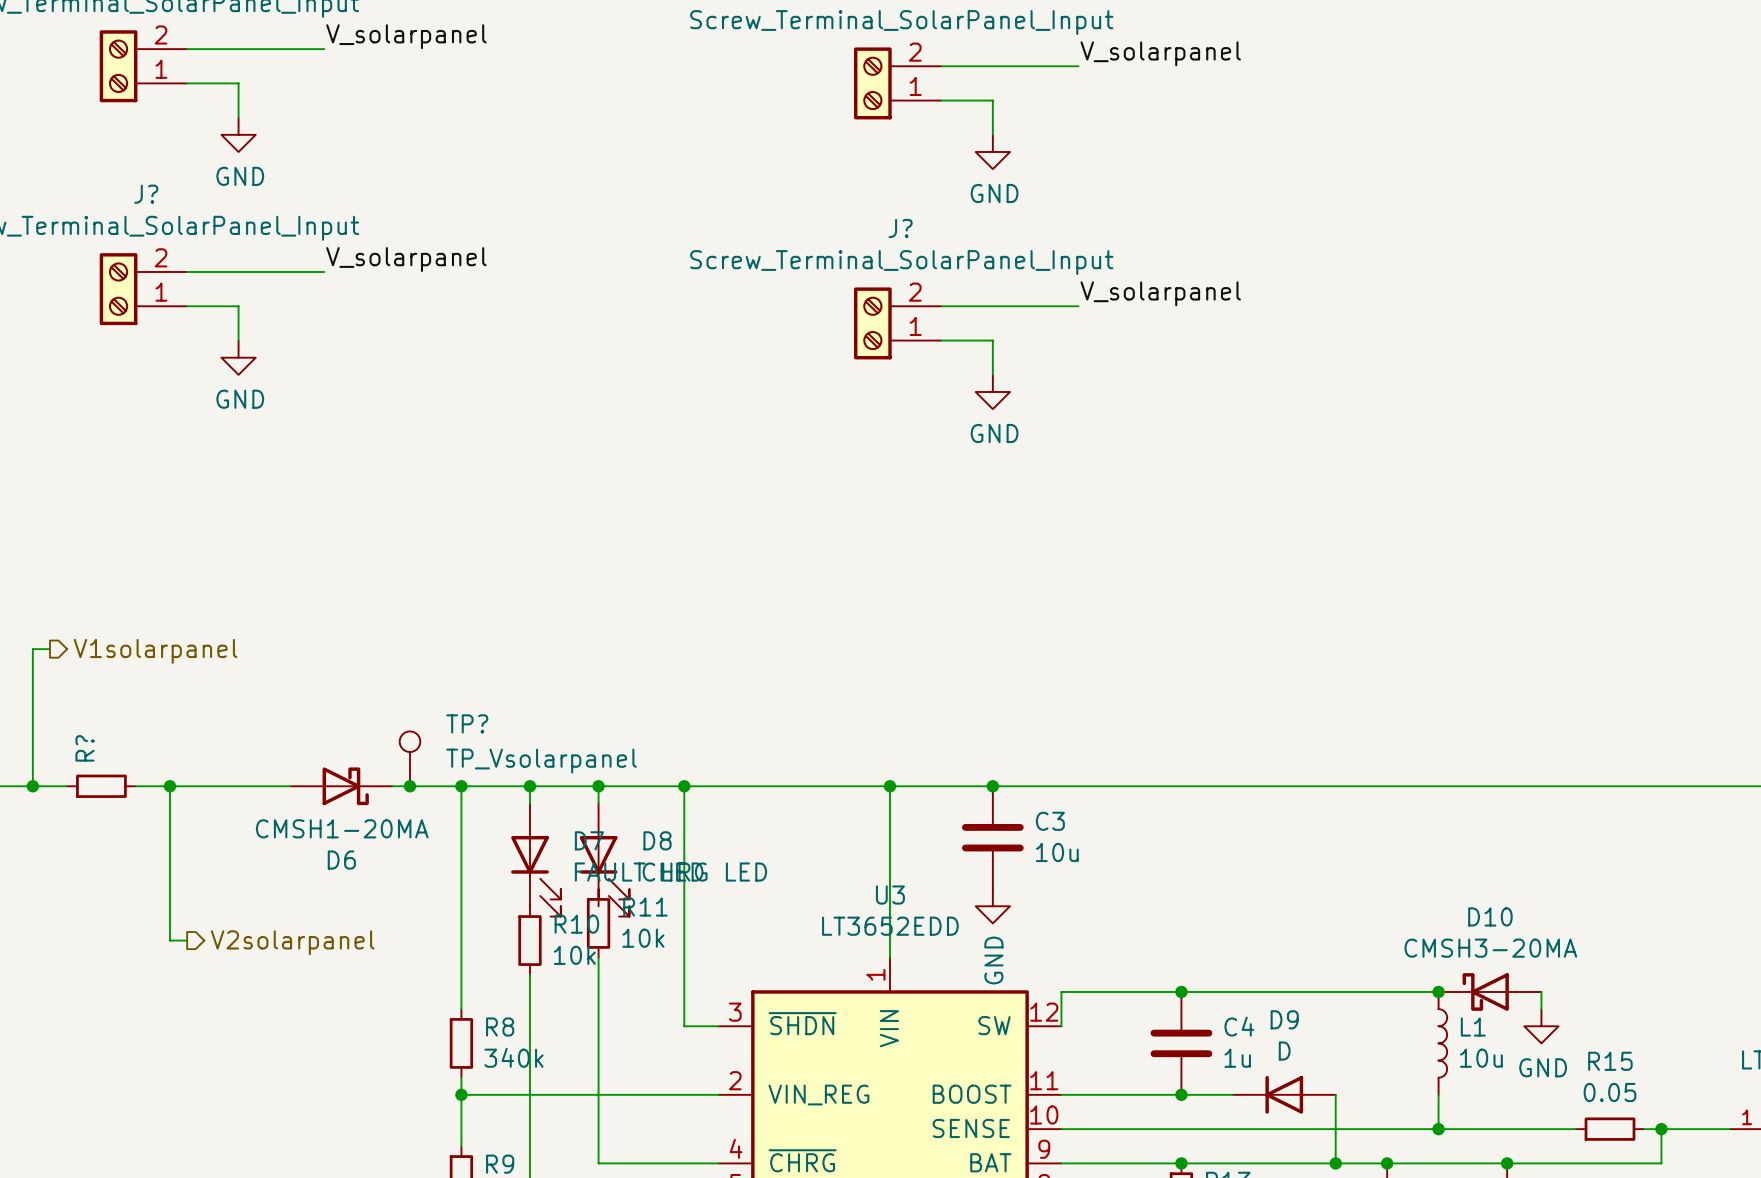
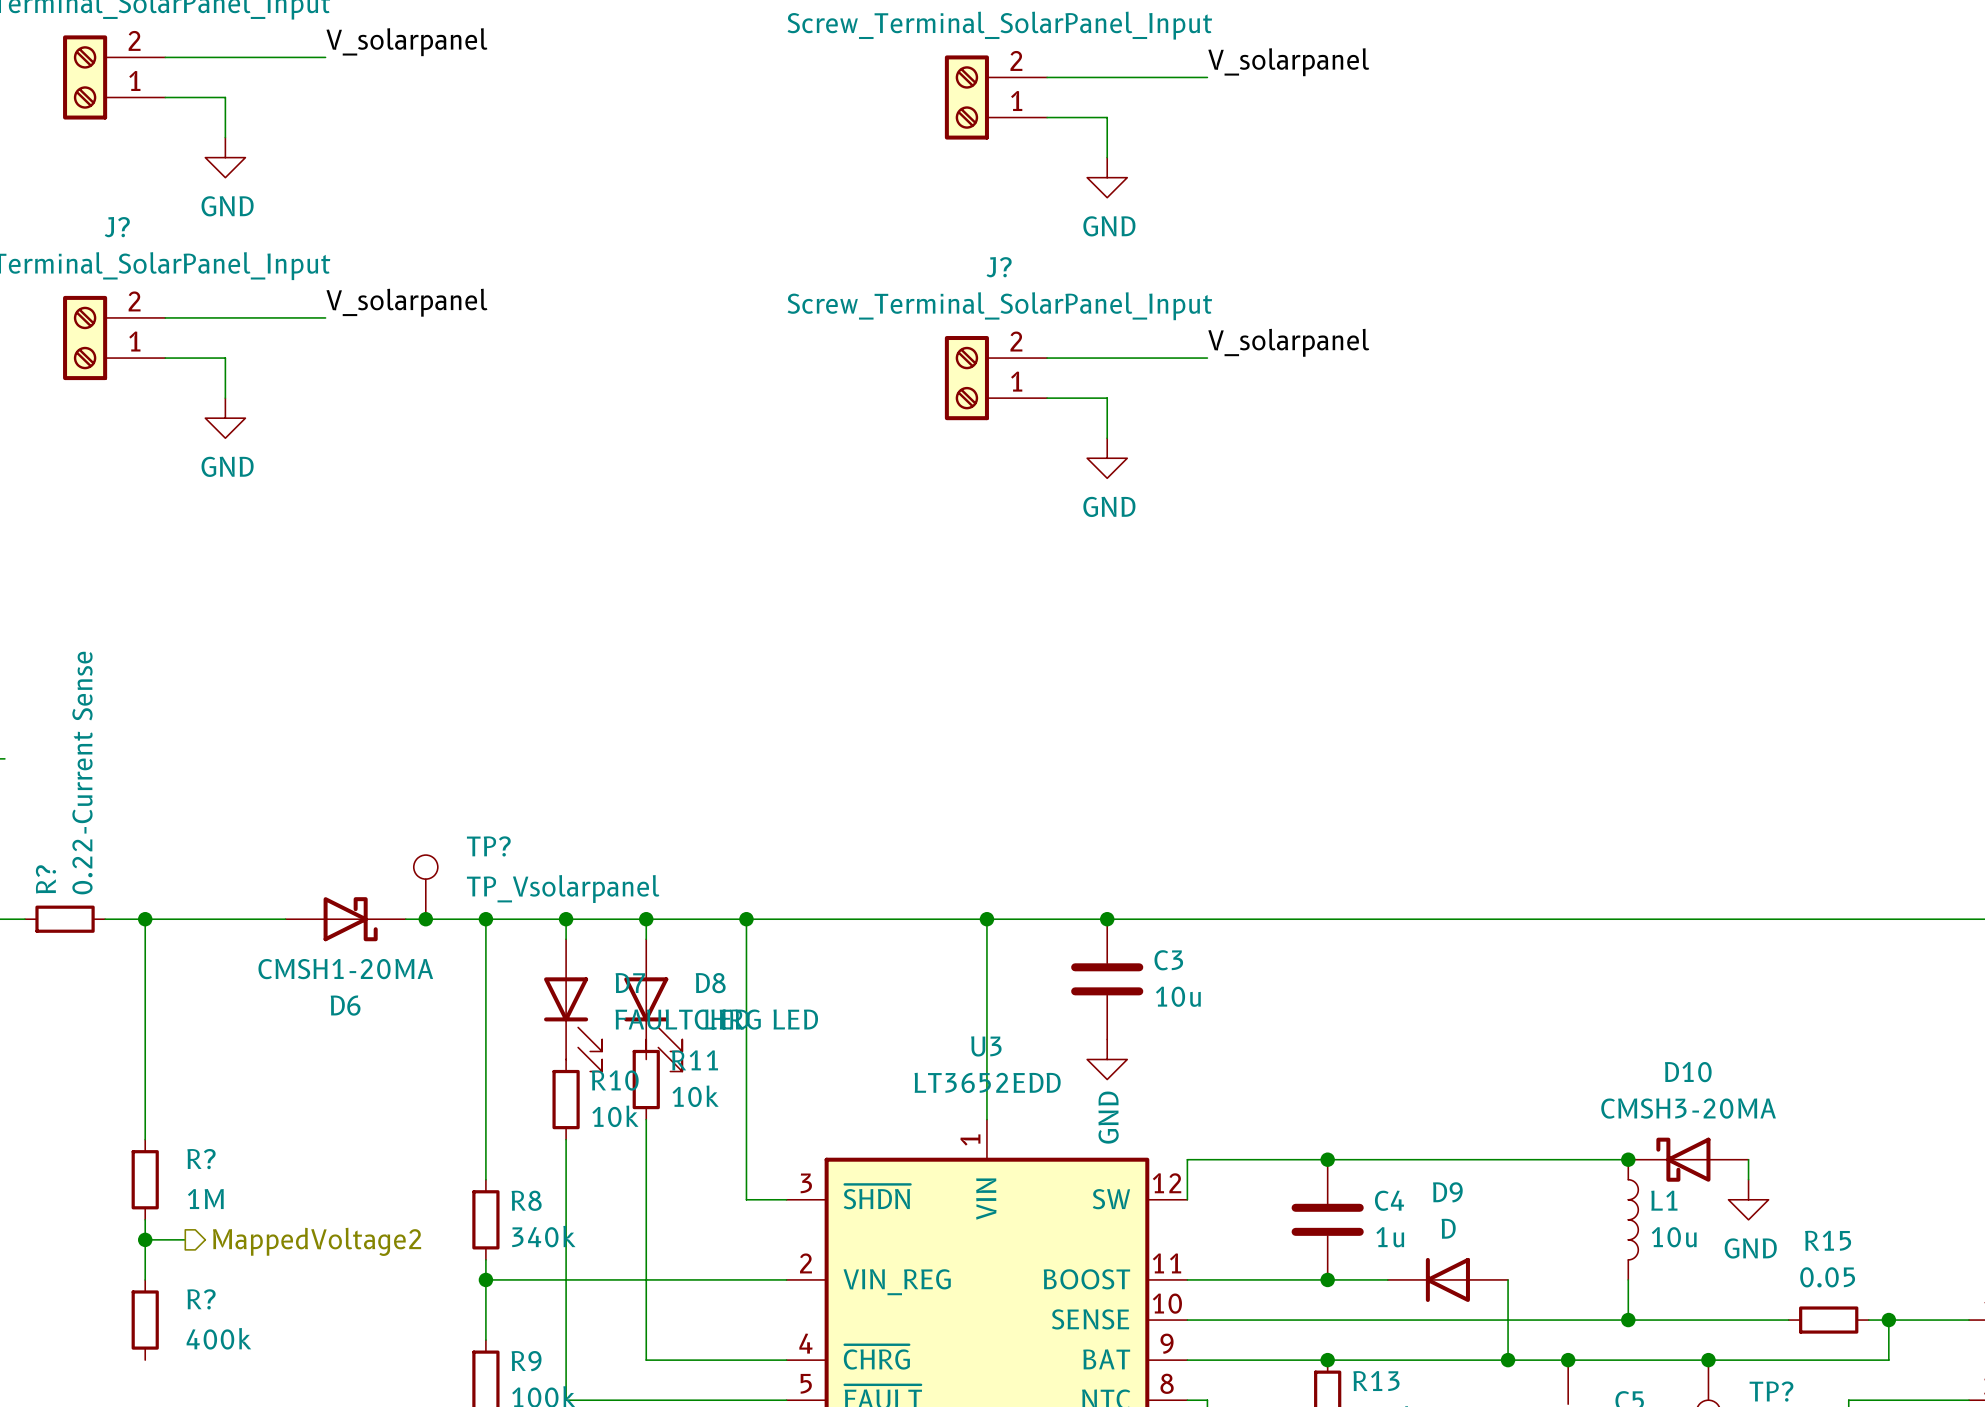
R? value: none -> 0.22-Current Sense (82, 773)
hierarchical label: V1solarpanel (155, 651) -> none
wire: (169, 940) (187, 940) -> (145, 1099) (145, 1139)
hierarchical label: V2solarpanel (292, 942) -> none
R?: none -> 1M (145, 1179)
wire: none -> (145, 1219) (145, 1279)
wire: none -> (145, 1239) (185, 1239)
junction: none -> (145, 1239)
hierarchical label: none -> MappedVoltage2 (317, 1241)
R?: none -> 400k (145, 1320)

